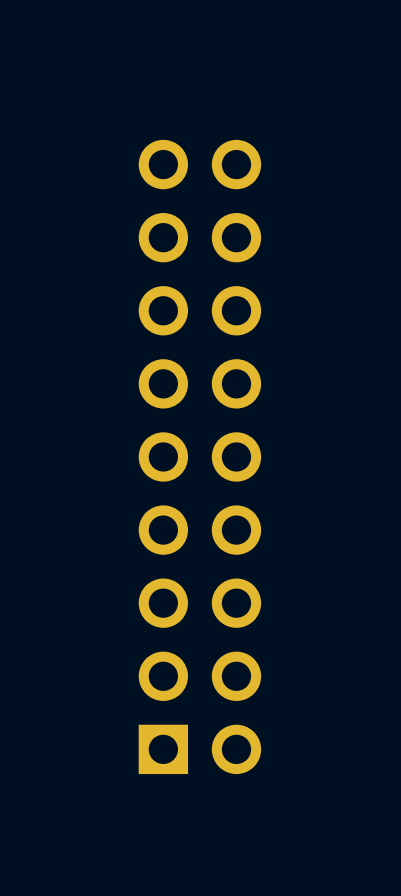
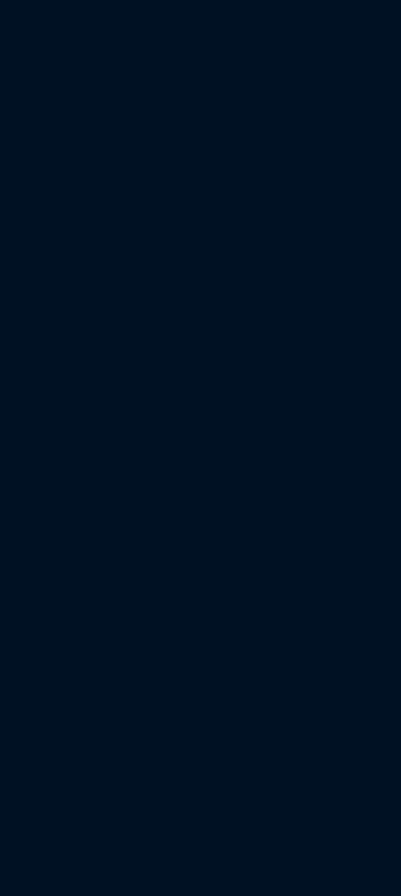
part: (199, 456) -> none

